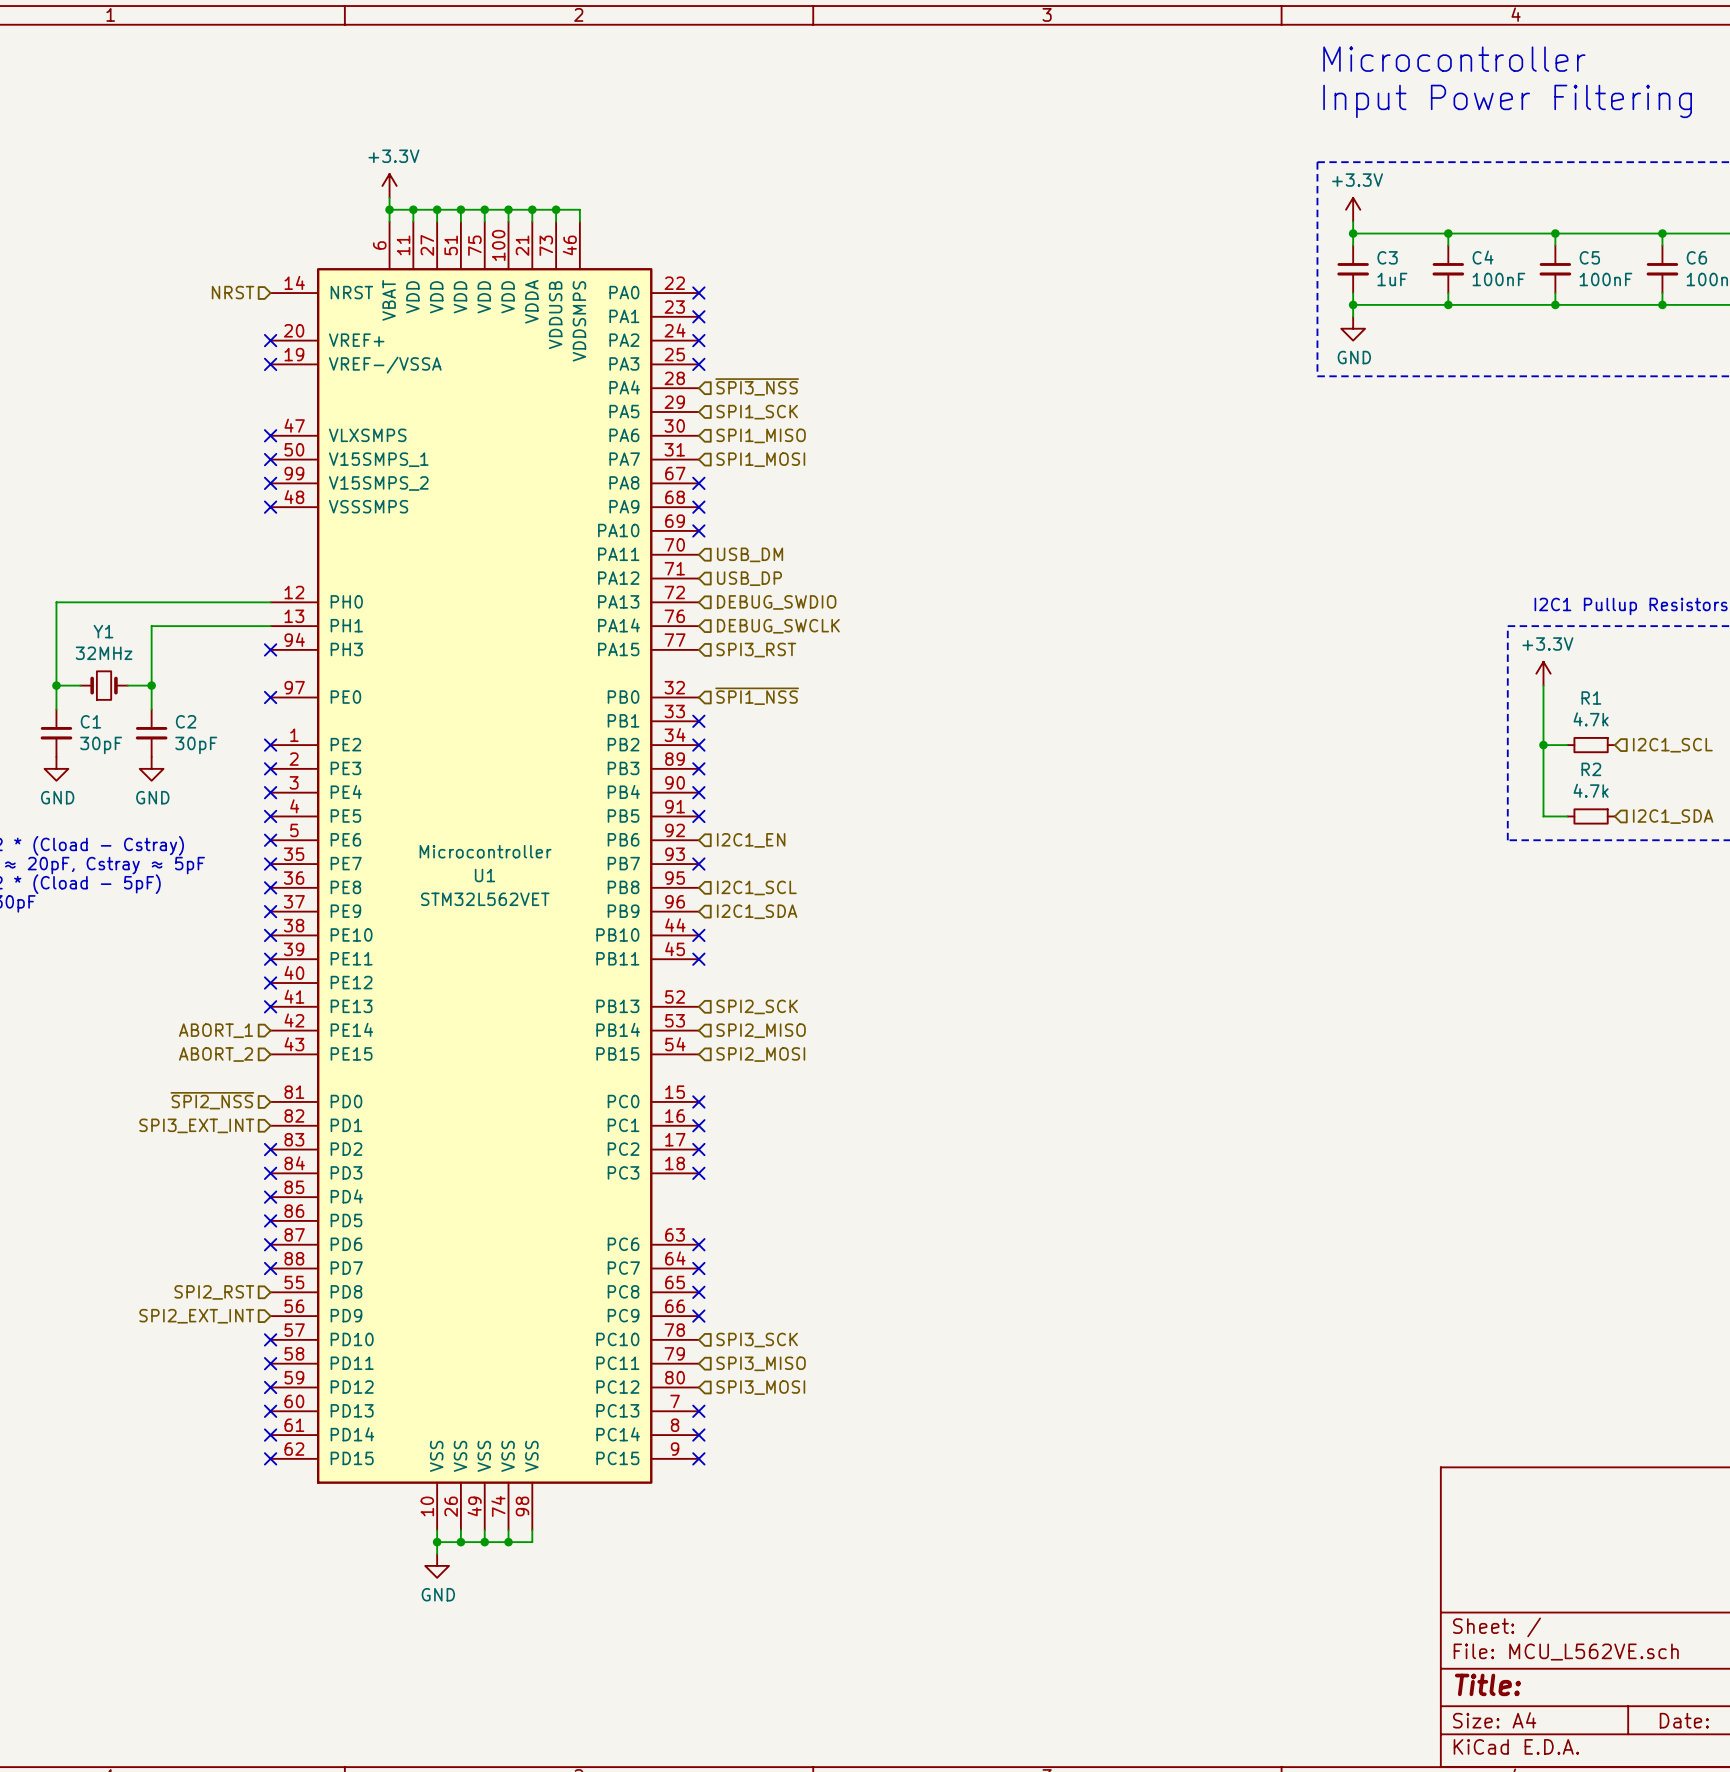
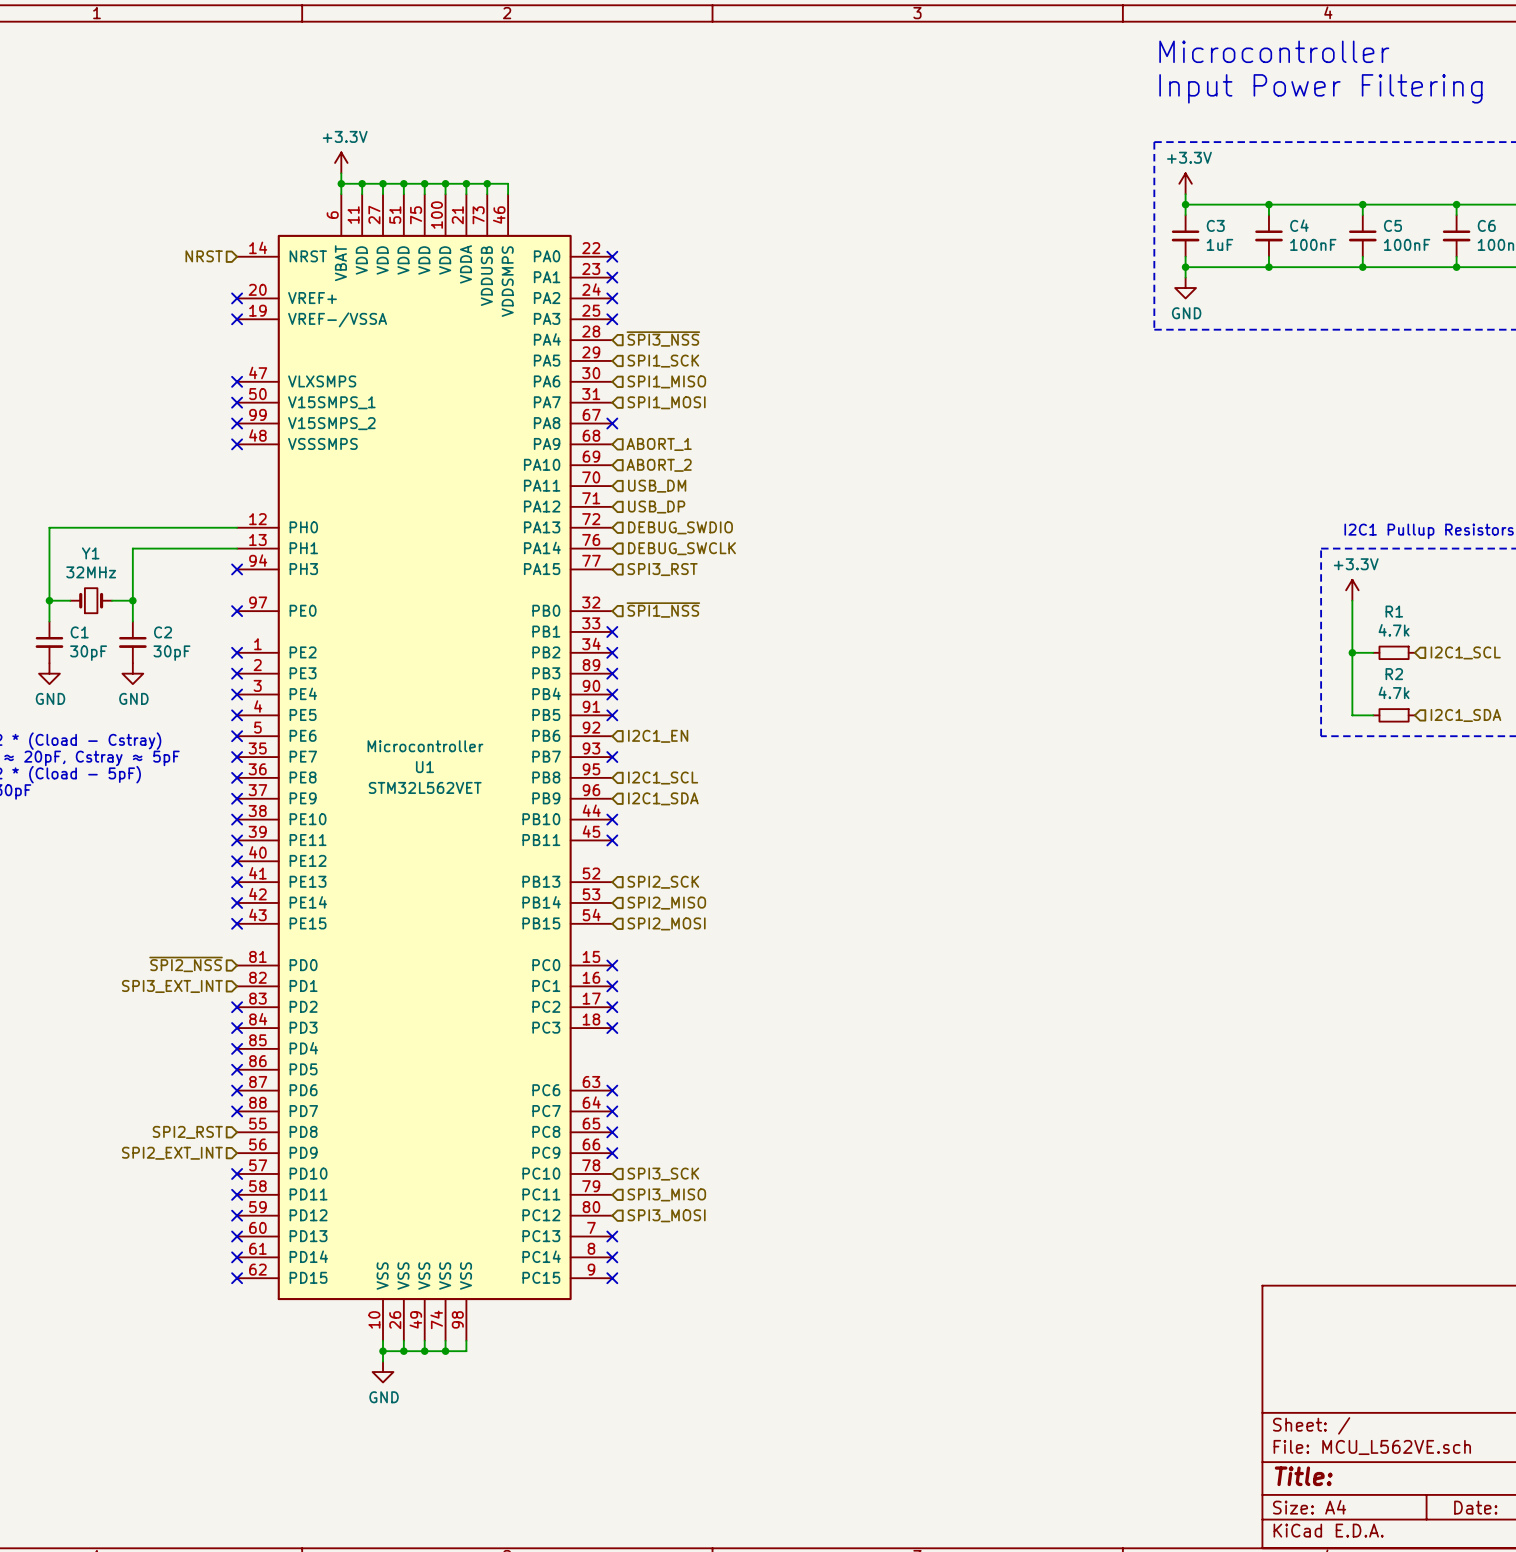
no-connect mark: (698, 507) -> none
hierarchical label: none -> ABORT_1 (659, 444)
no-connect mark: (698, 530) -> none
hierarchical label: none -> ABORT_2 (659, 465)
hierarchical label: ABORT_1 (216, 1030) -> none
no-connect mark: none -> (237, 902)
hierarchical label: ABORT_2 (216, 1054) -> none
no-connect mark: none -> (237, 923)

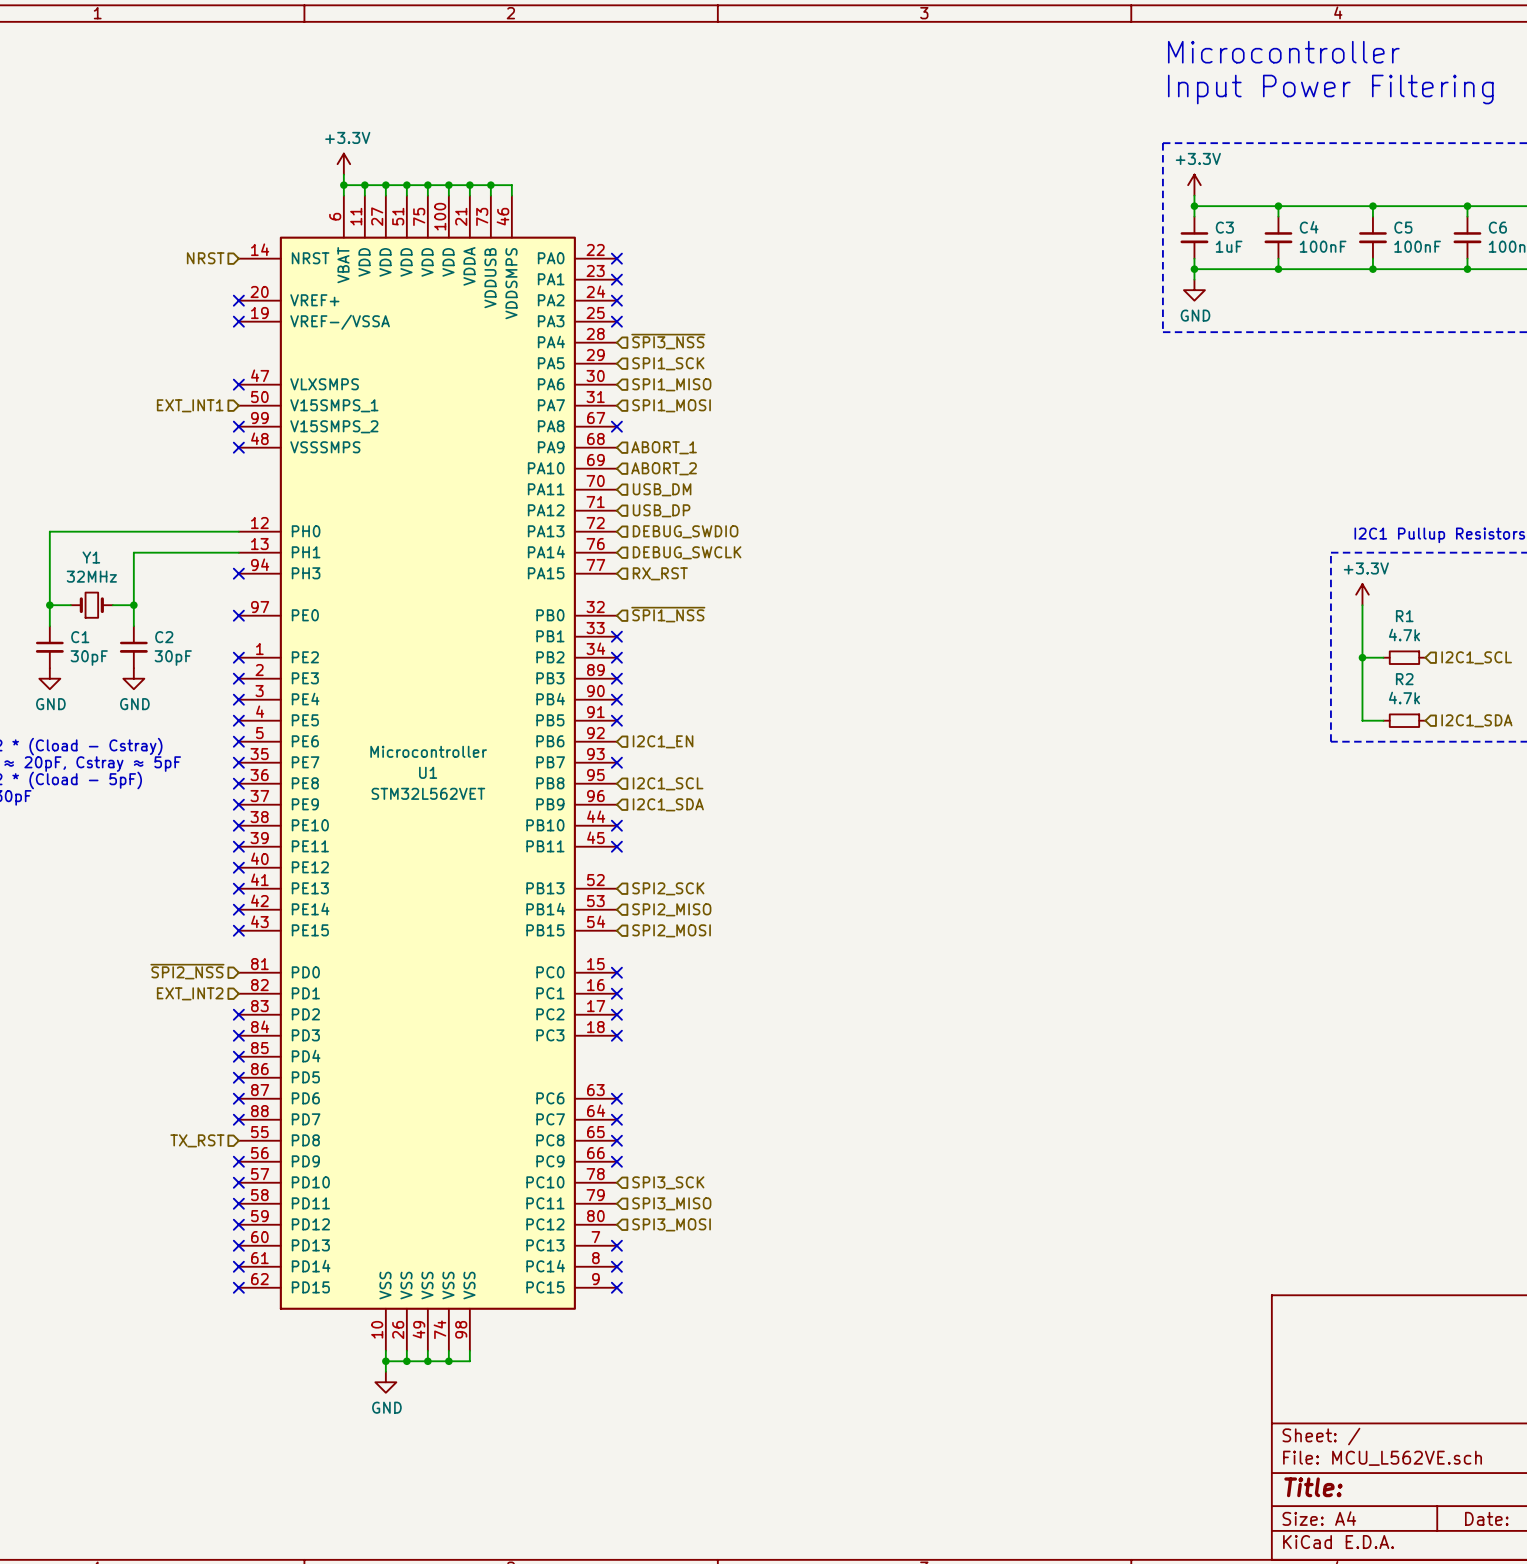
hierarchical label: none -> EXT_INT1 (190, 405)
no-connect mark: (237, 402) -> none
hierarchical label: SPI3_RST (662, 569) -> RX_RST (660, 573)
hierarchical label: SPI3_EXT_INT (172, 986) -> EXT_INT2 (190, 993)
hierarchical label: SPI2_RST (187, 1132) -> TX_RST (197, 1140)
hierarchical label: SPI2_EXT_INT (172, 1153) -> none
no-connect mark: none -> (238, 1161)

